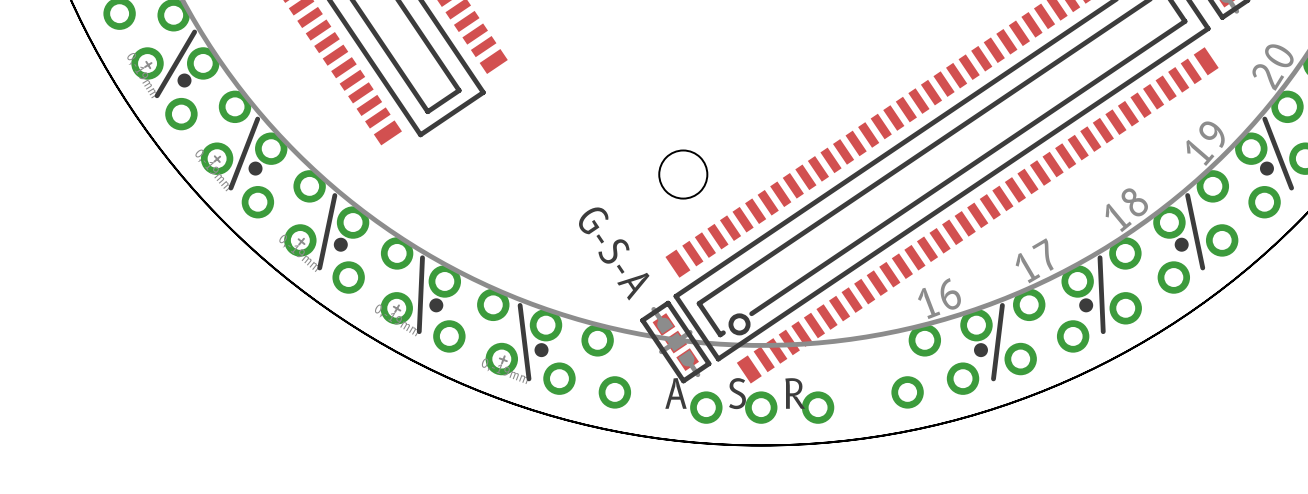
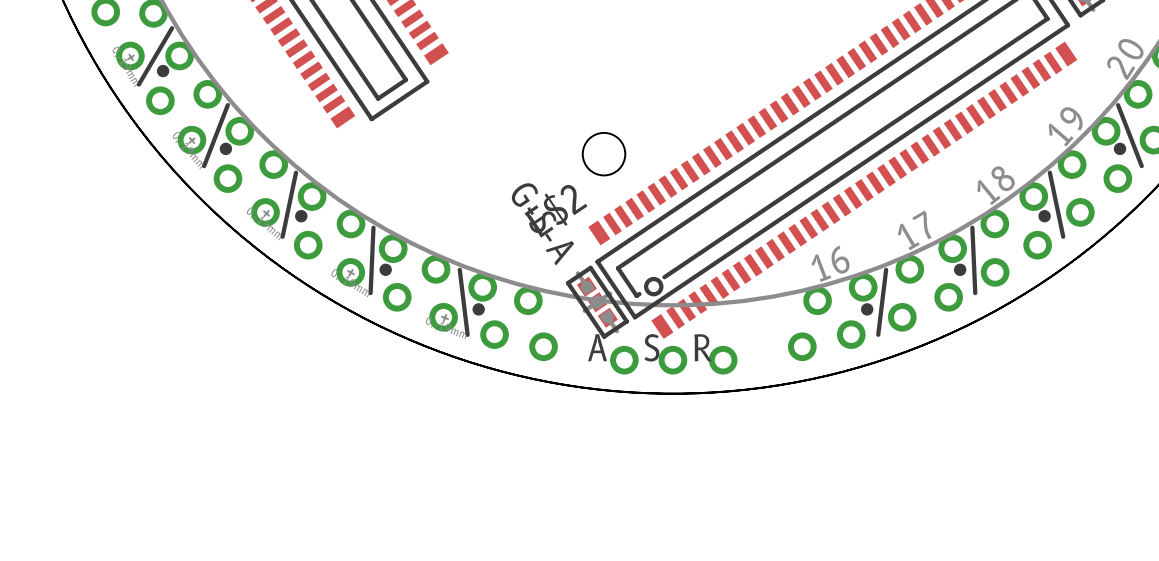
E$2 name: none -> E$2 (555, 211)

